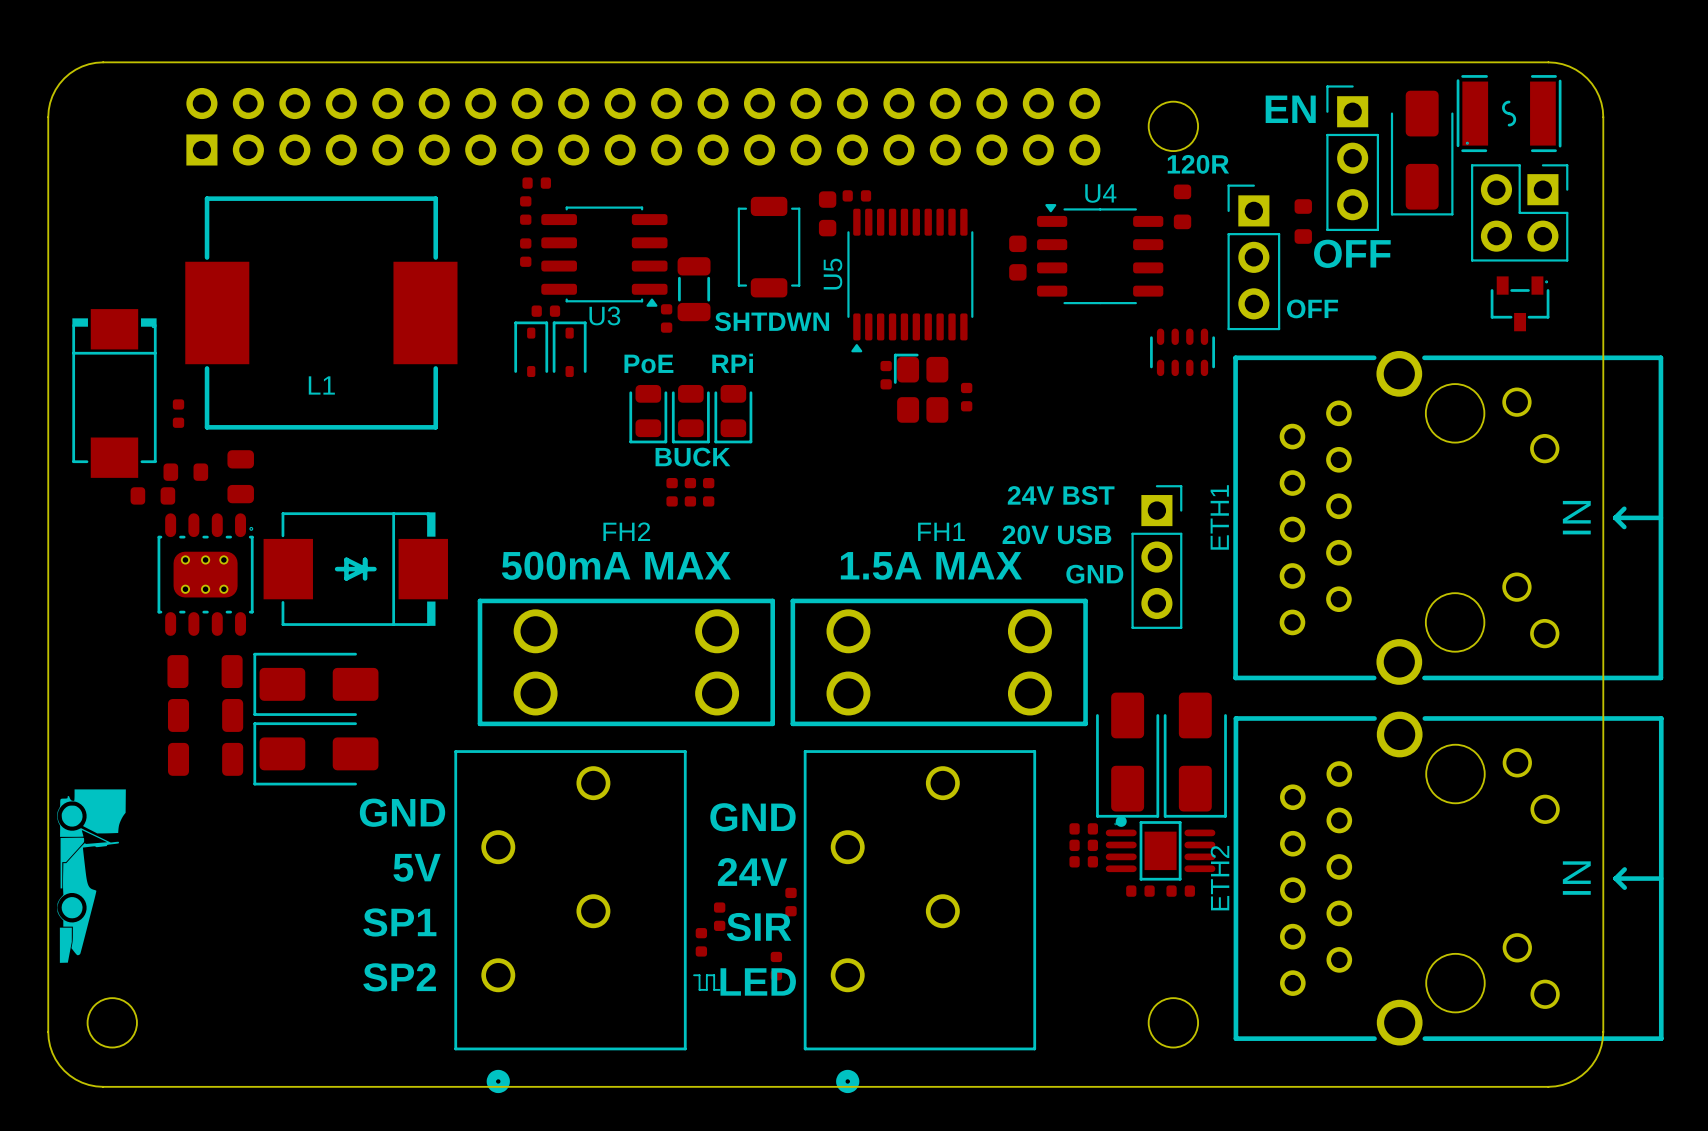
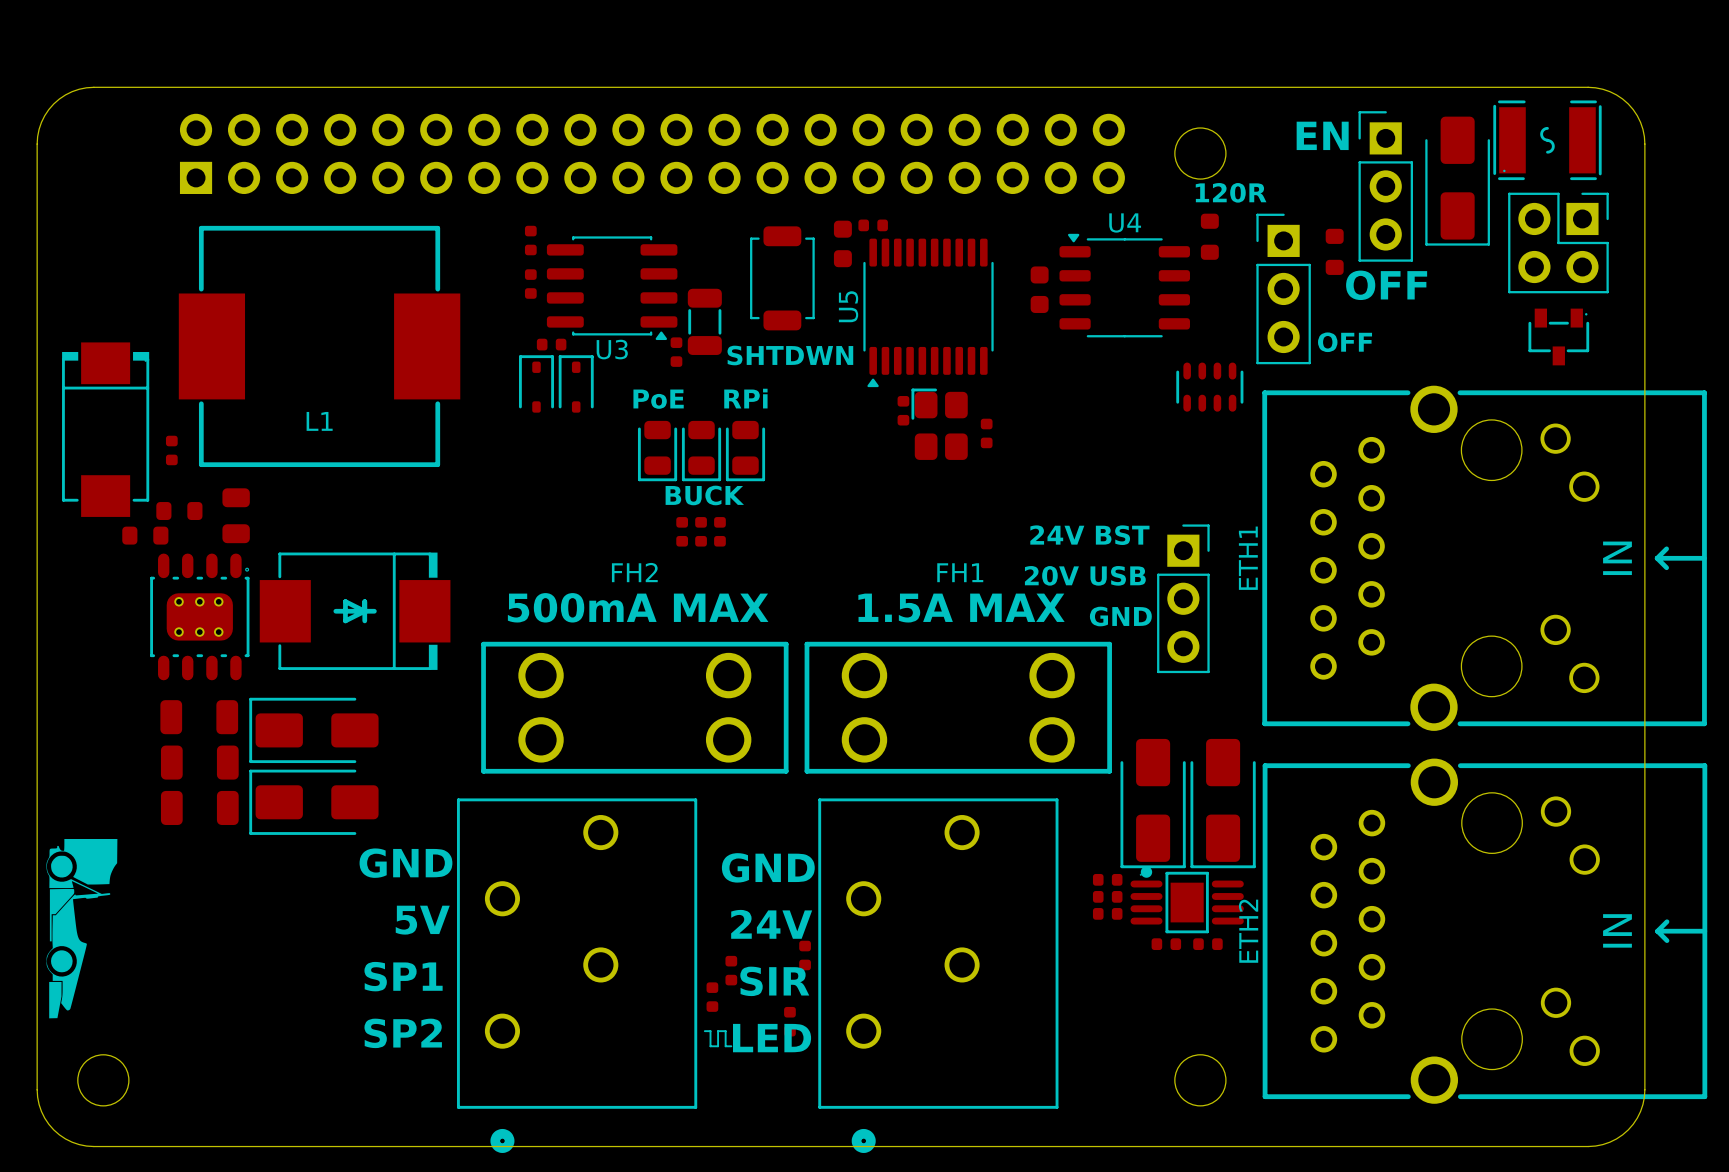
part: (536, 183) -> none

